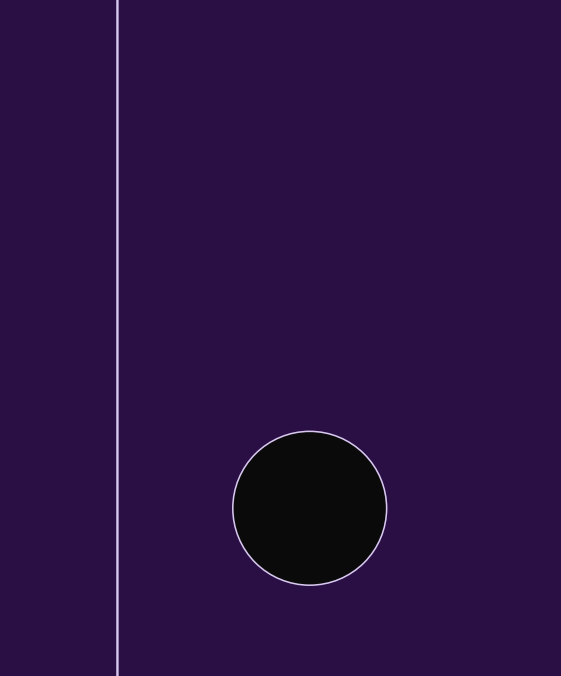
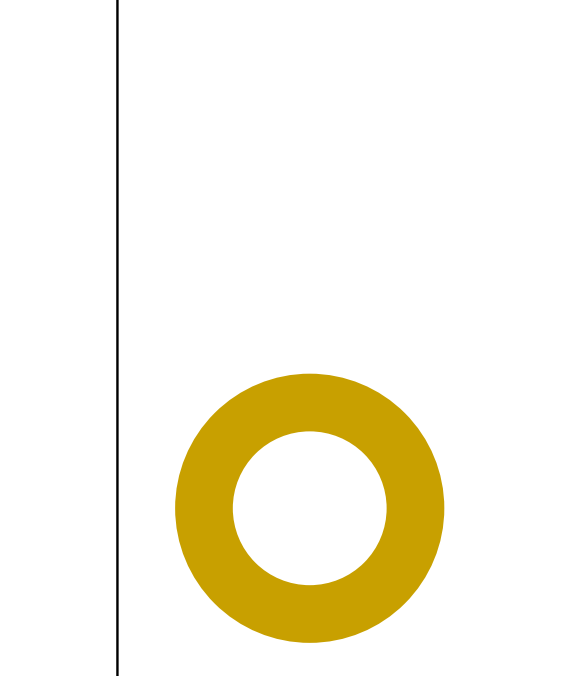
part footprint: [232, 431, 387, 586] -> [175, 373, 445, 643]

